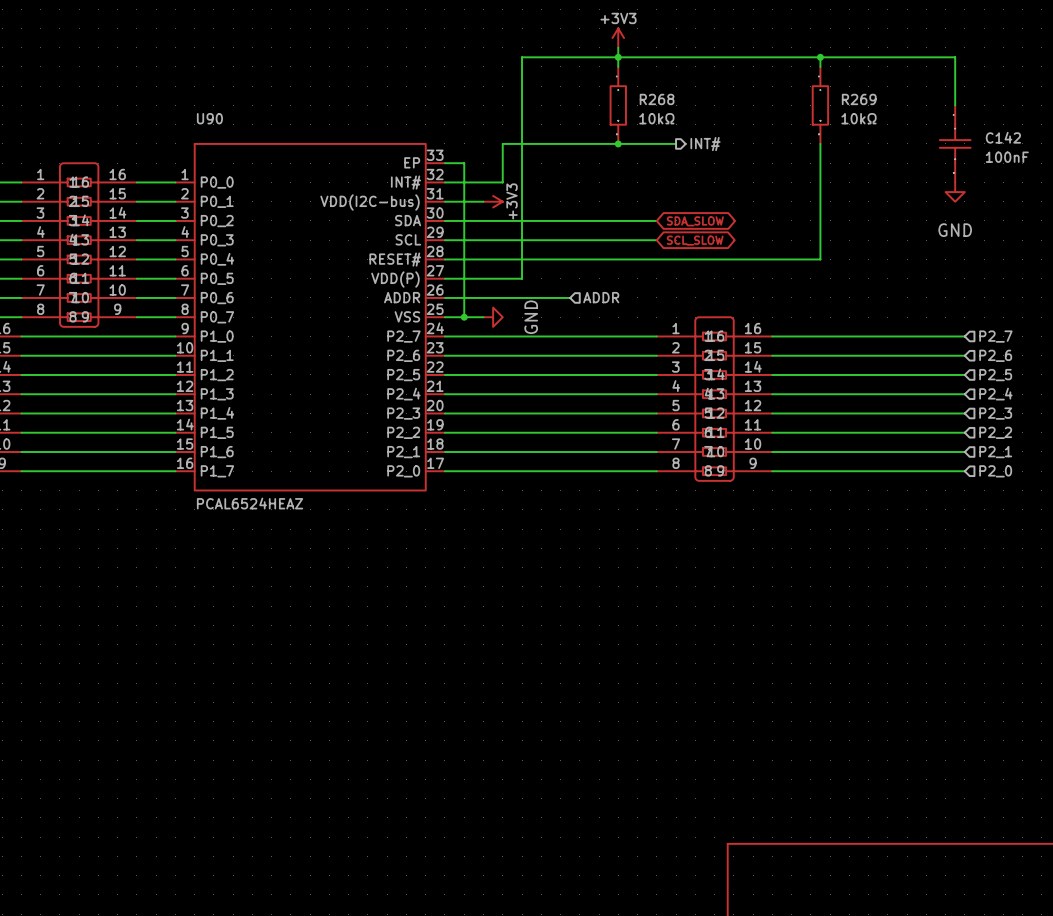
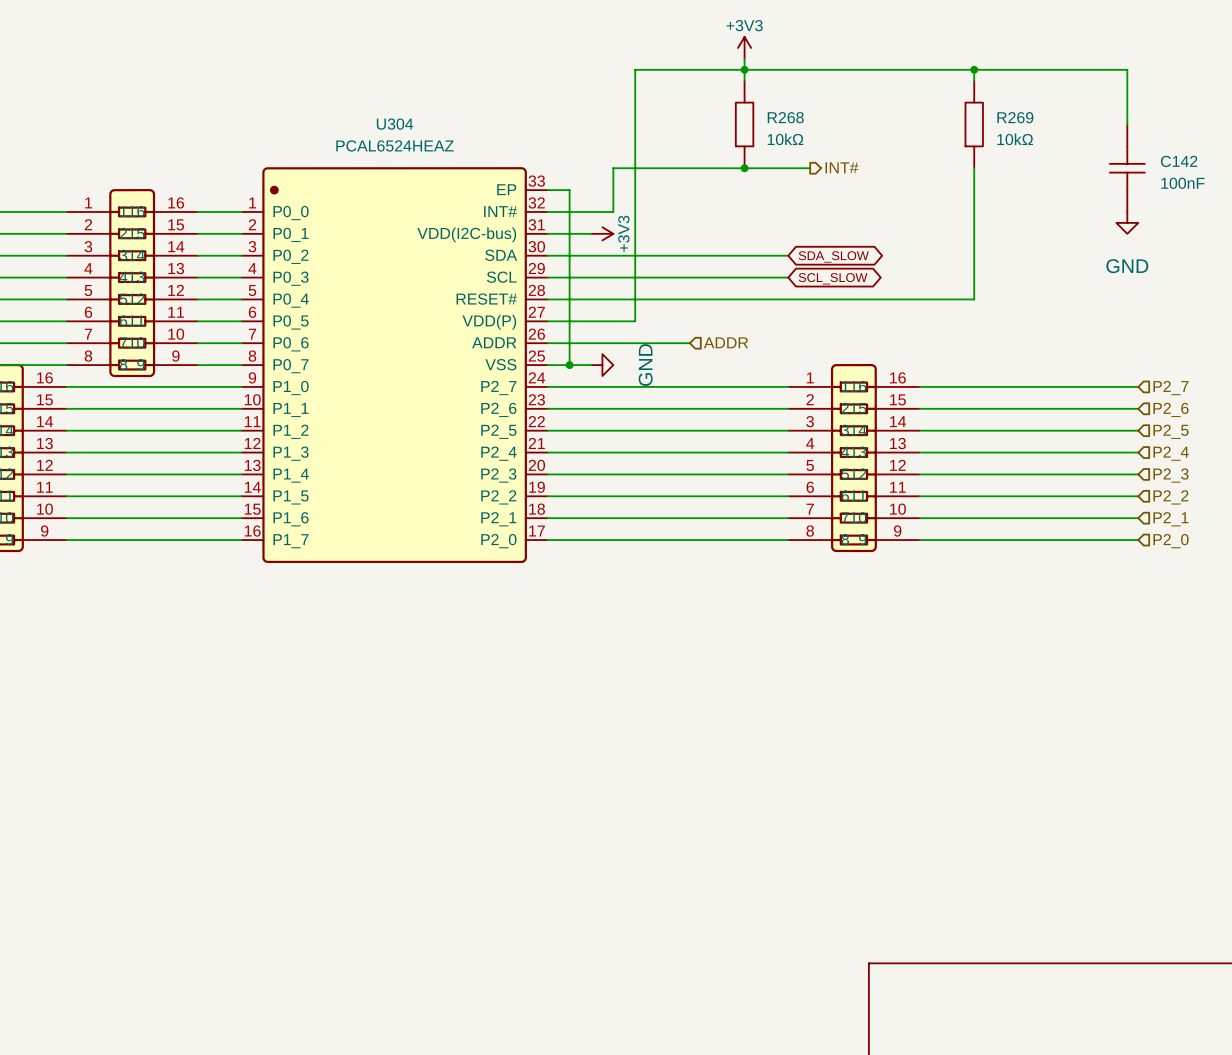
U90: PCAL6524HEAZ (310, 317) -> none
U304: none -> PCAL6524HEAZ (394, 365)

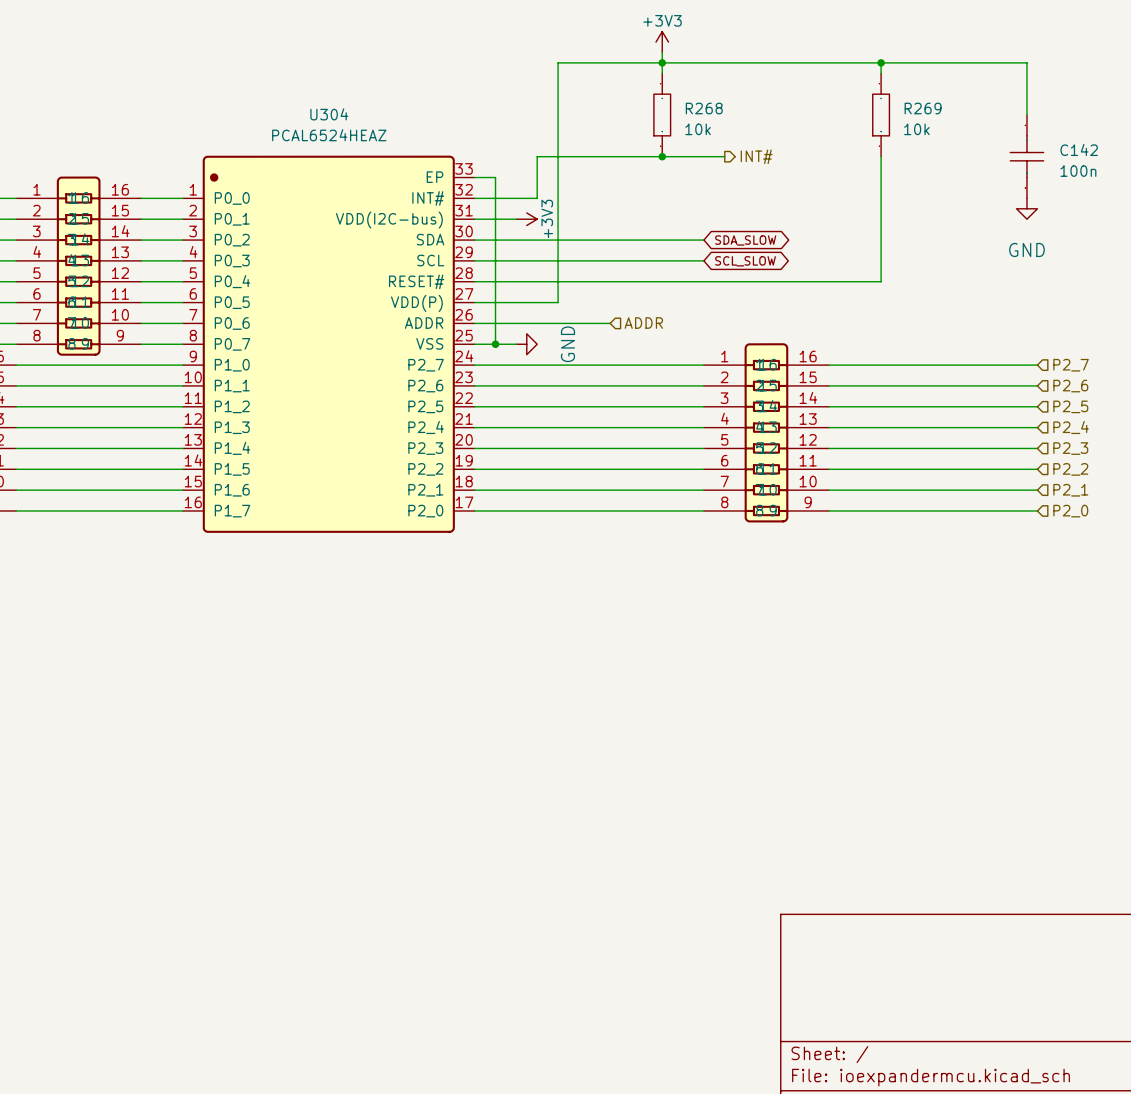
R268 value: 10kΩ (785, 139) -> 10k (698, 129)
R269 value: 10kΩ (1015, 139) -> 10k (916, 129)
C142 value: 100nF (1182, 183) -> 100n (1078, 171)

